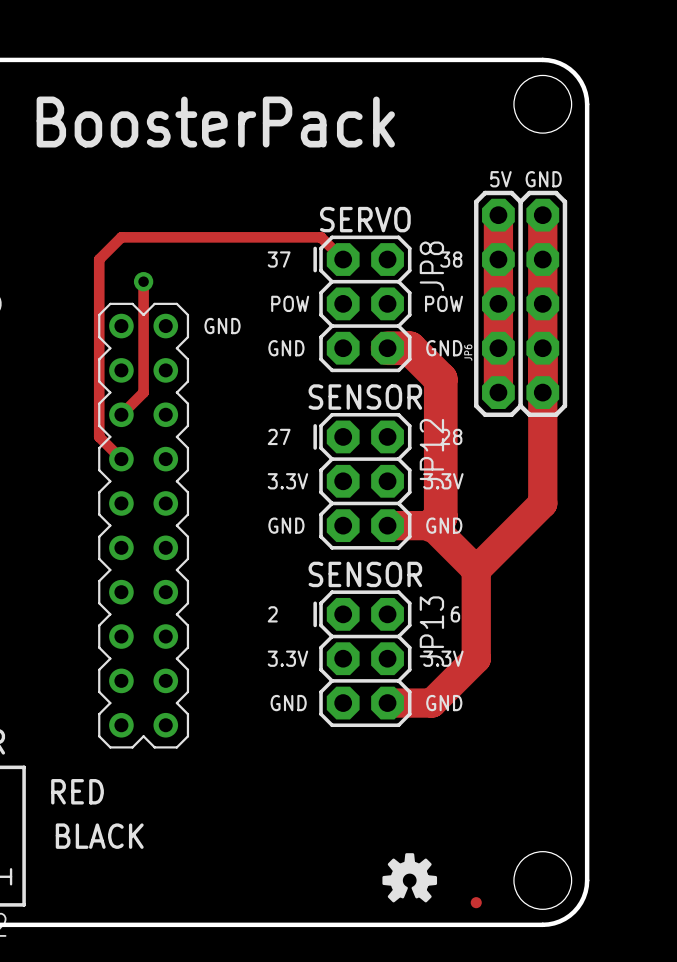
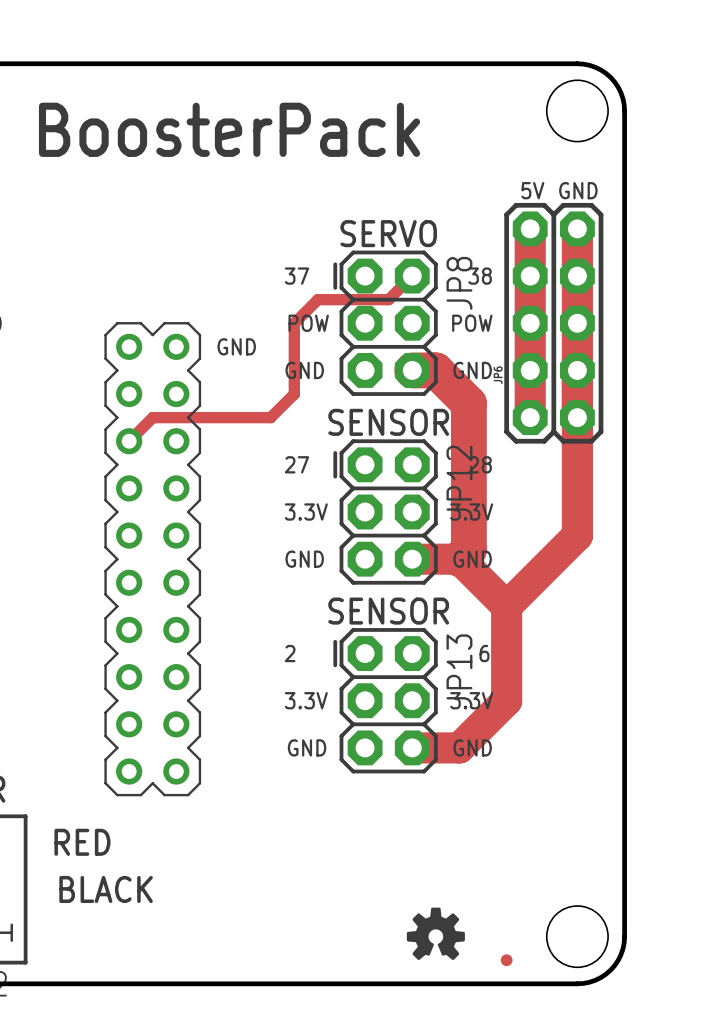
track: (343, 259) (321, 237) (121, 237) (99, 259) (99, 436) (121, 459) -> none
track: (143, 281) (143, 392) -> (412, 276) (388, 299) (317, 299) (294, 323) (294, 394) (270, 417) (152, 417)
via: (143, 281) -> none

